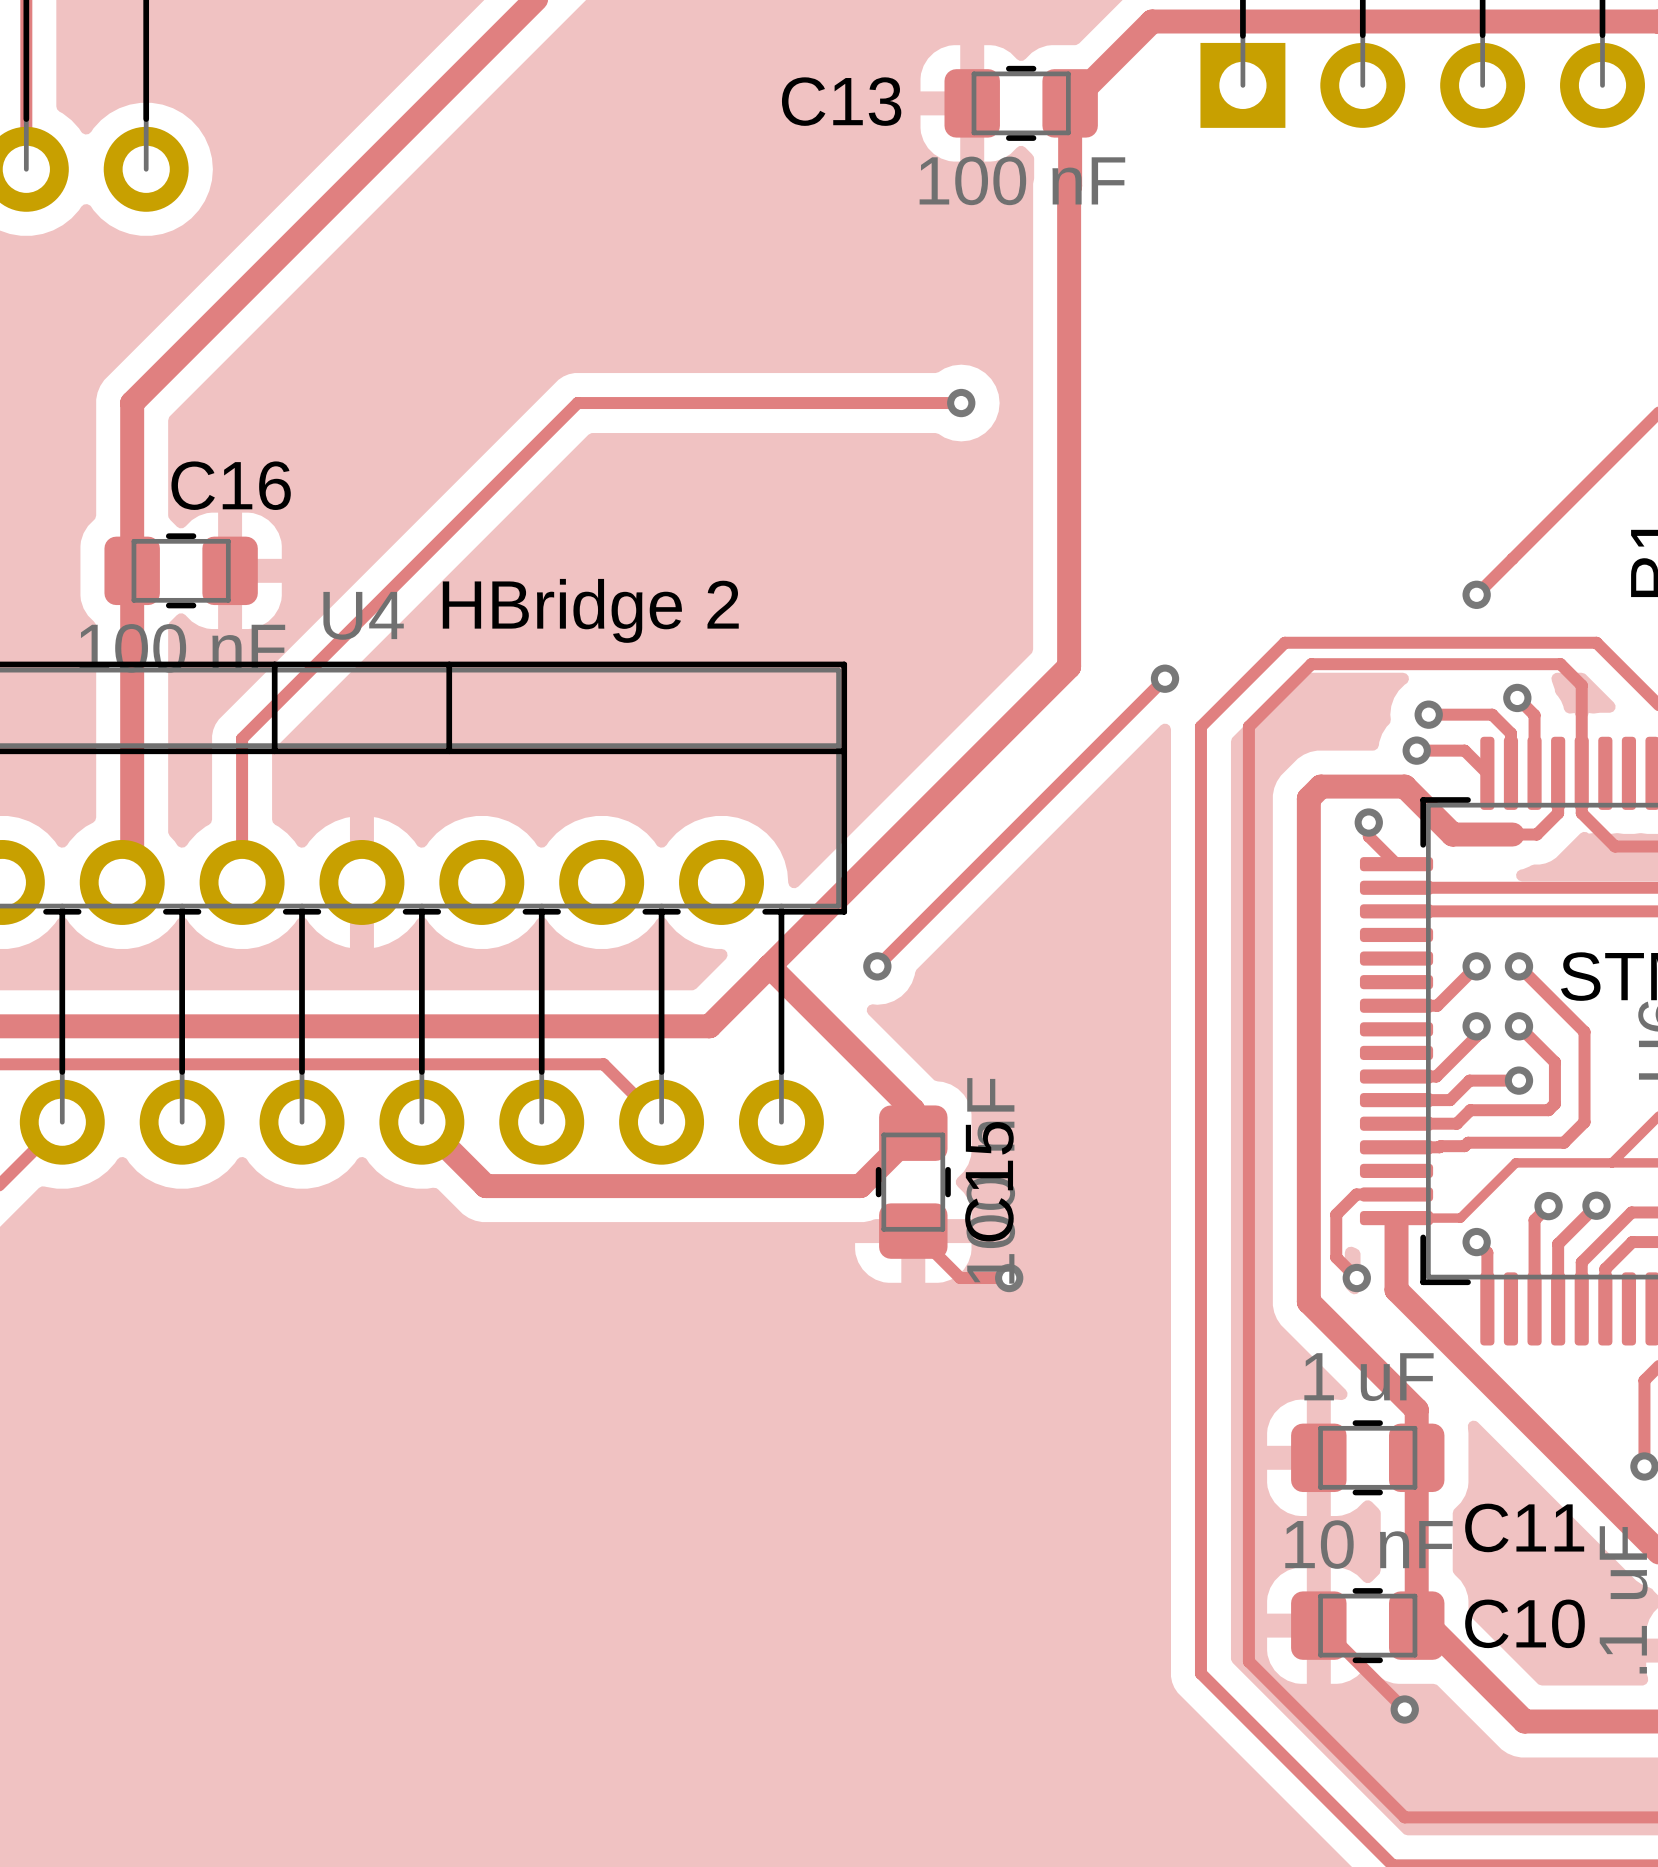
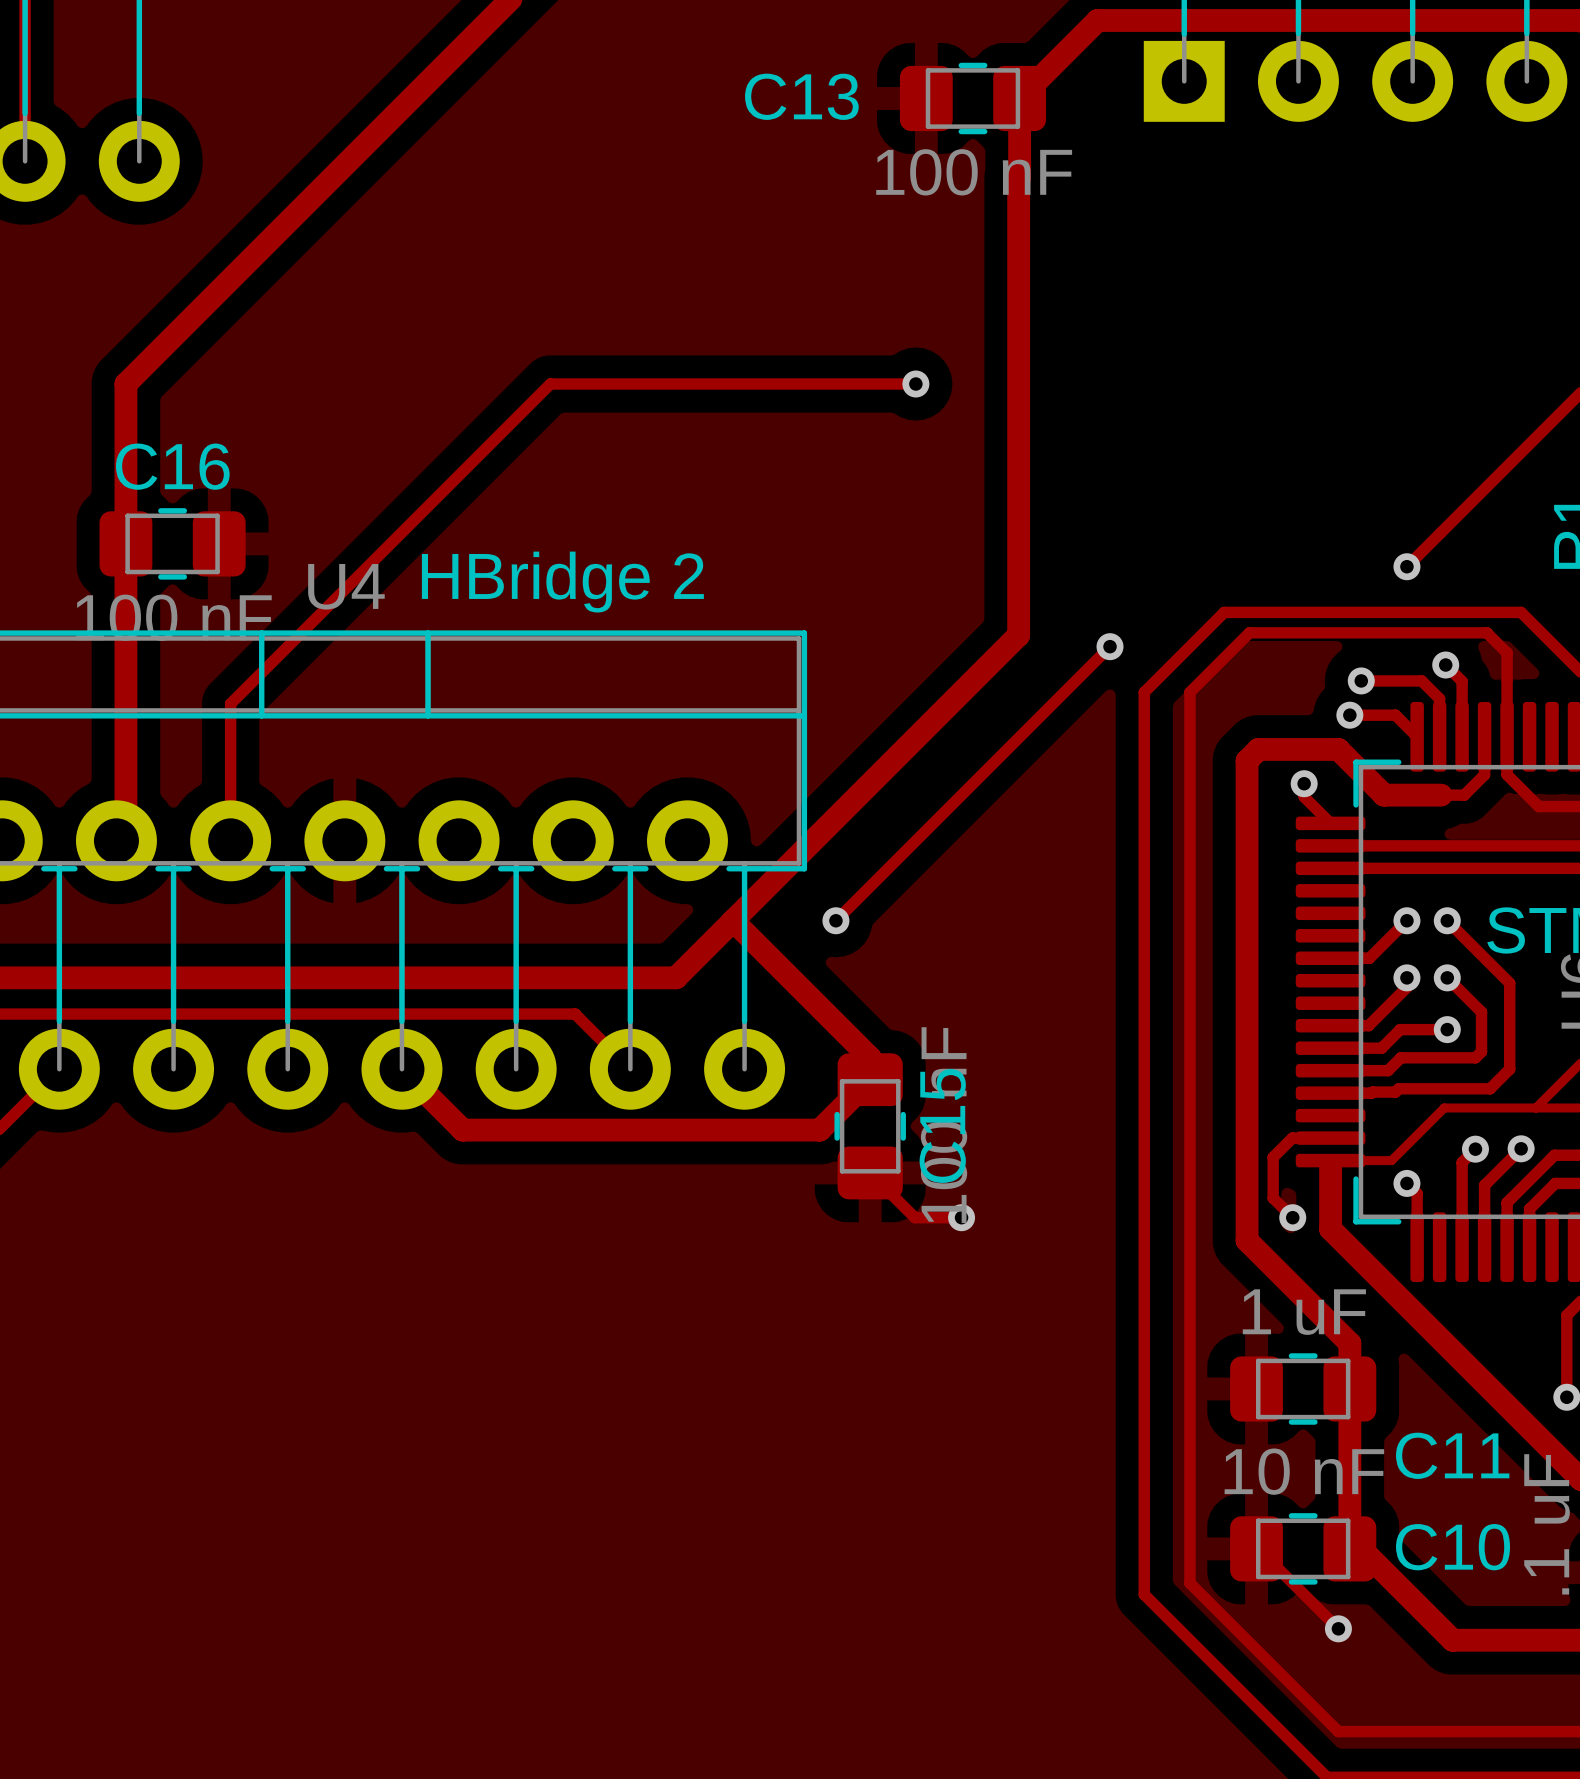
C16 name position: C16 (231, 485) -> C16 (172, 466)

